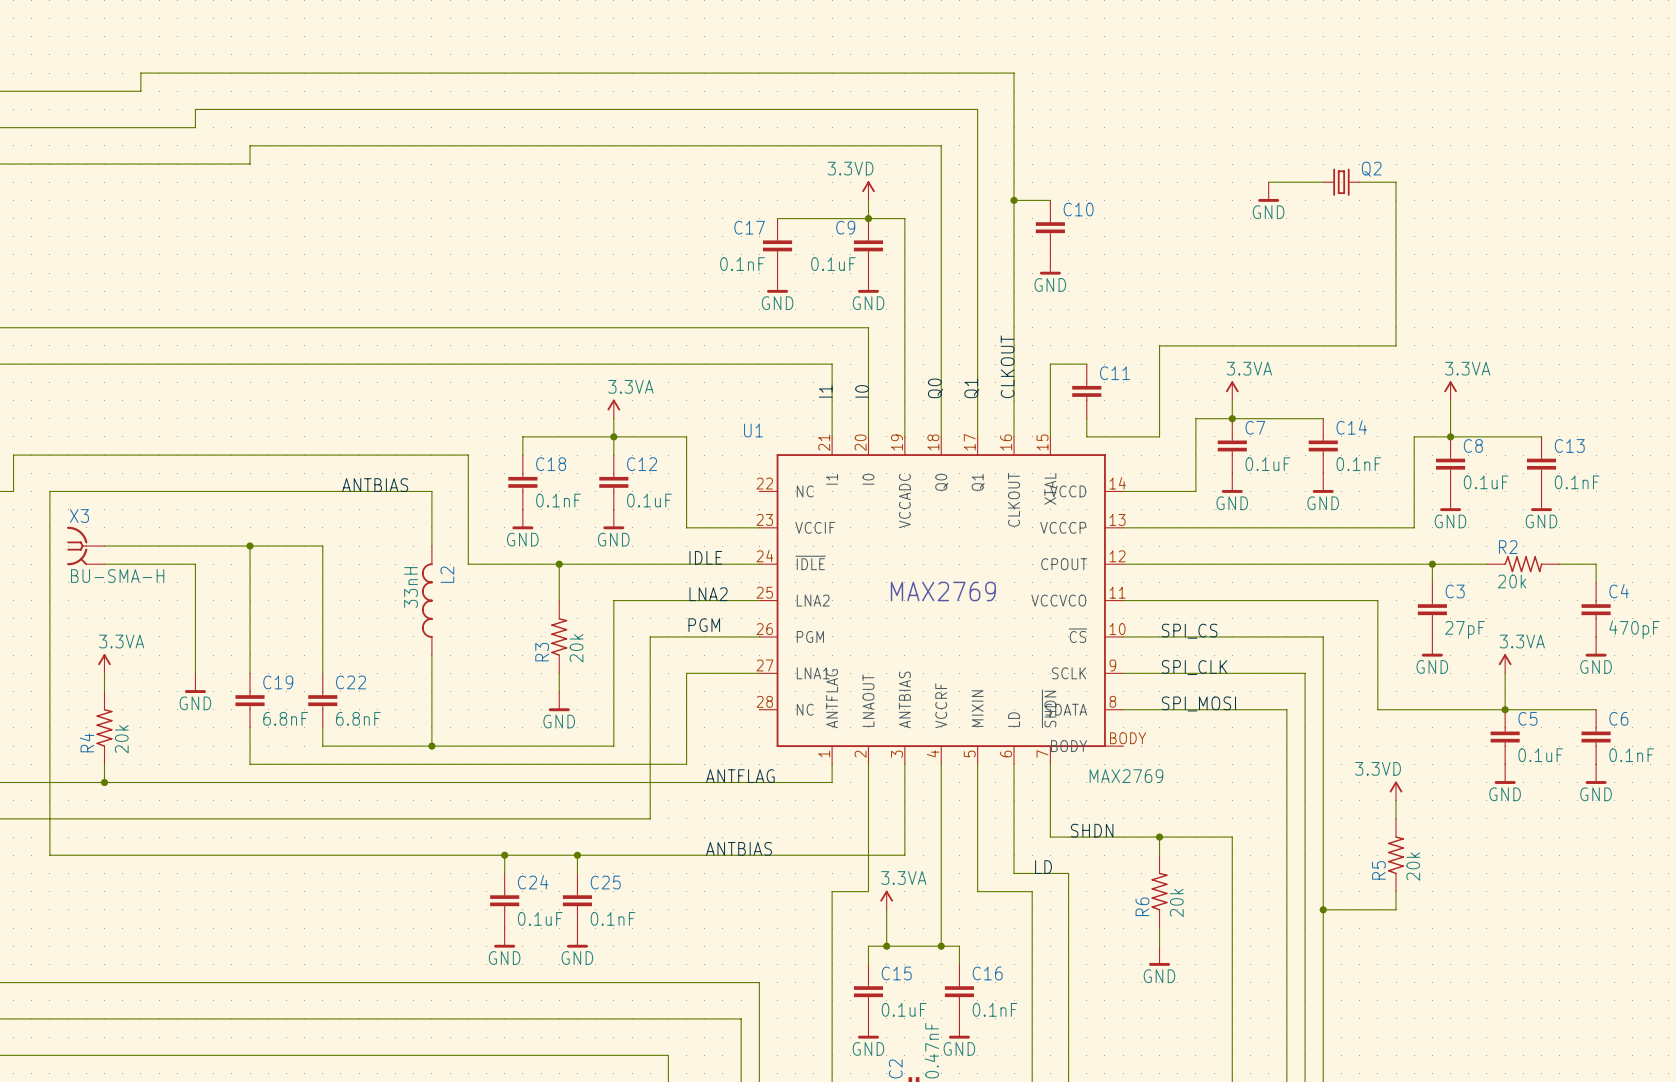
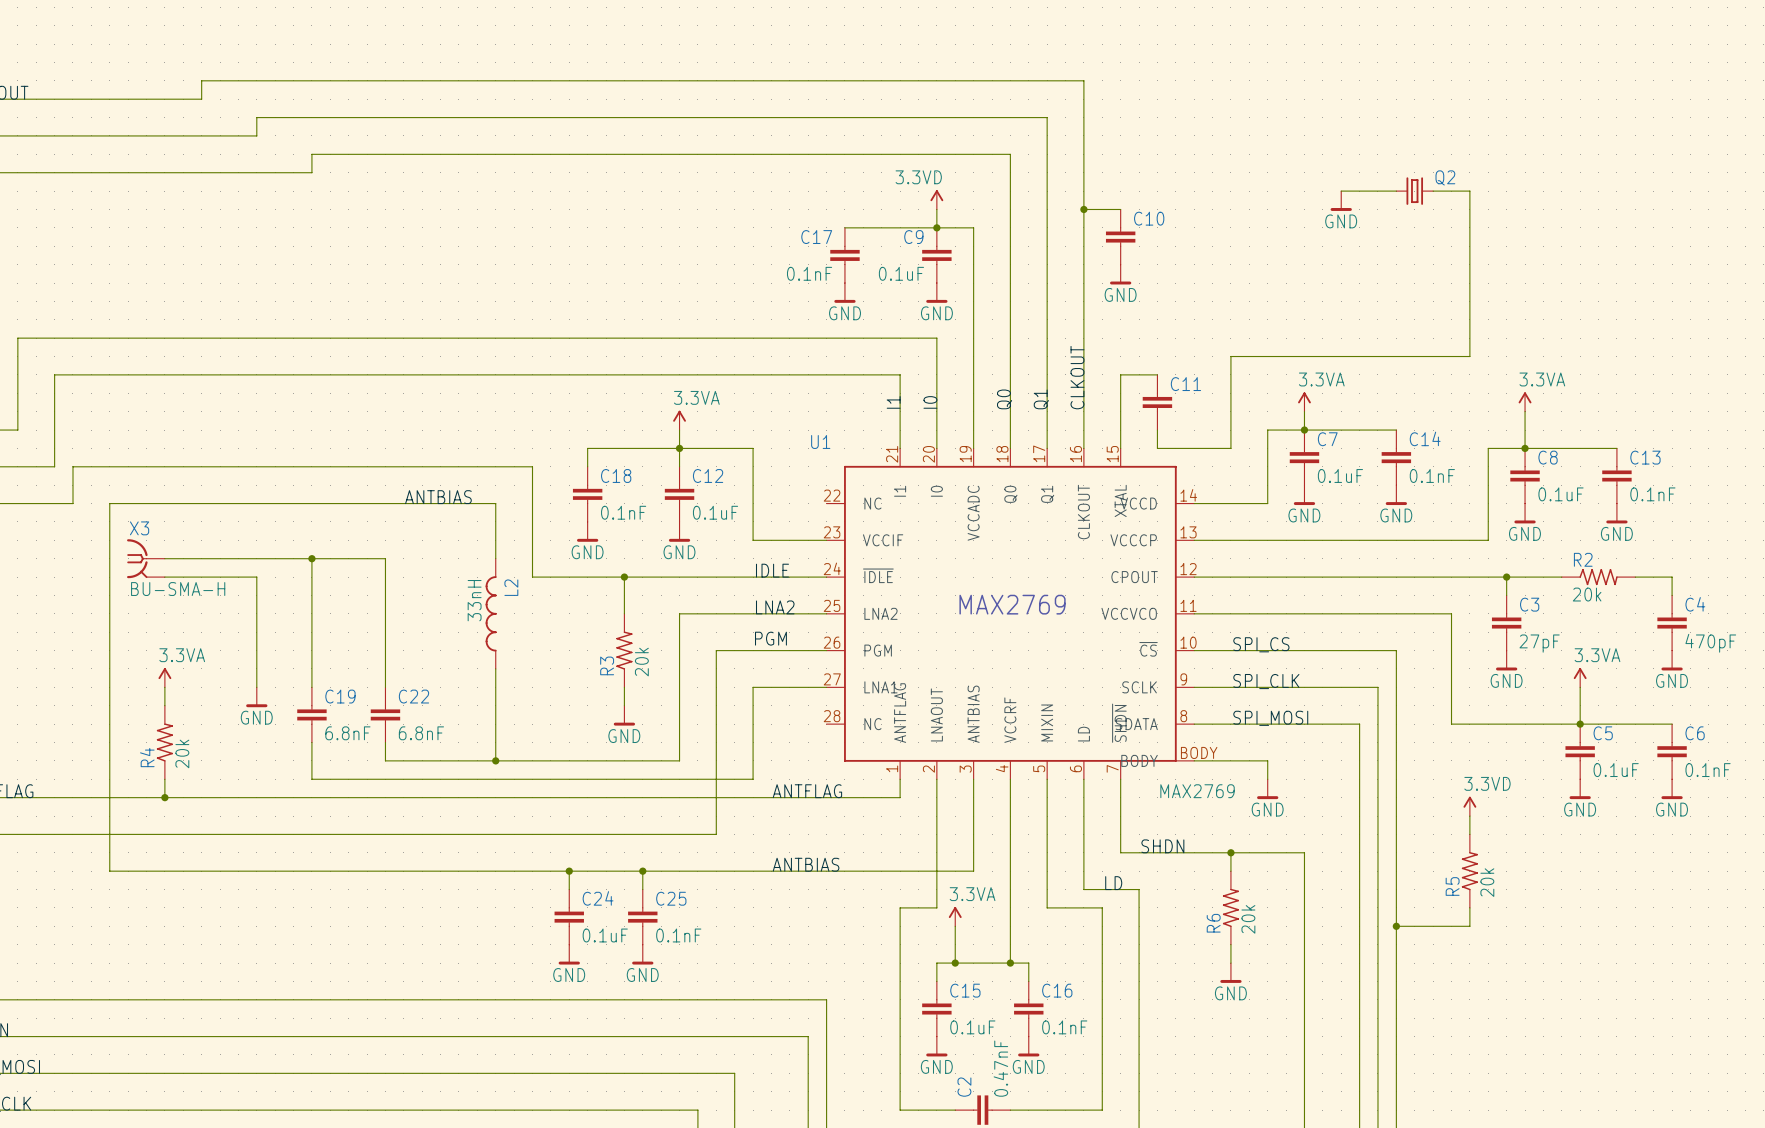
wire: none -> (1194, 760) (1267, 760) (1267, 779)
power symbol text position: 3.3VD (1378, 768) -> 3.3VD (1487, 783)
power symbol: none -> GND (1267, 789)

